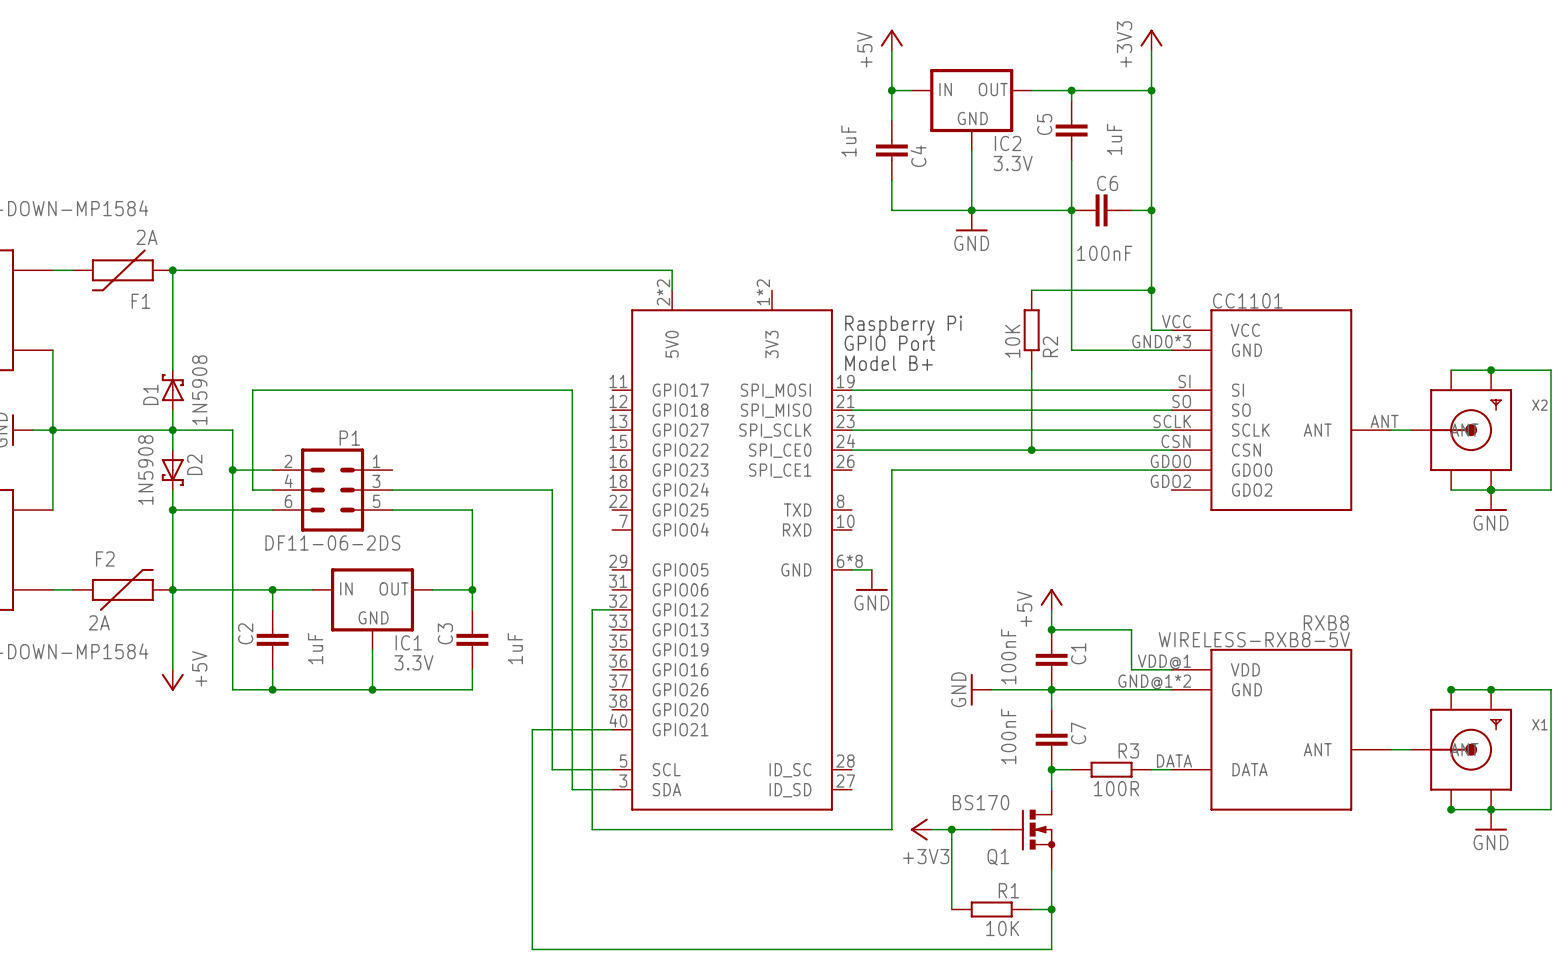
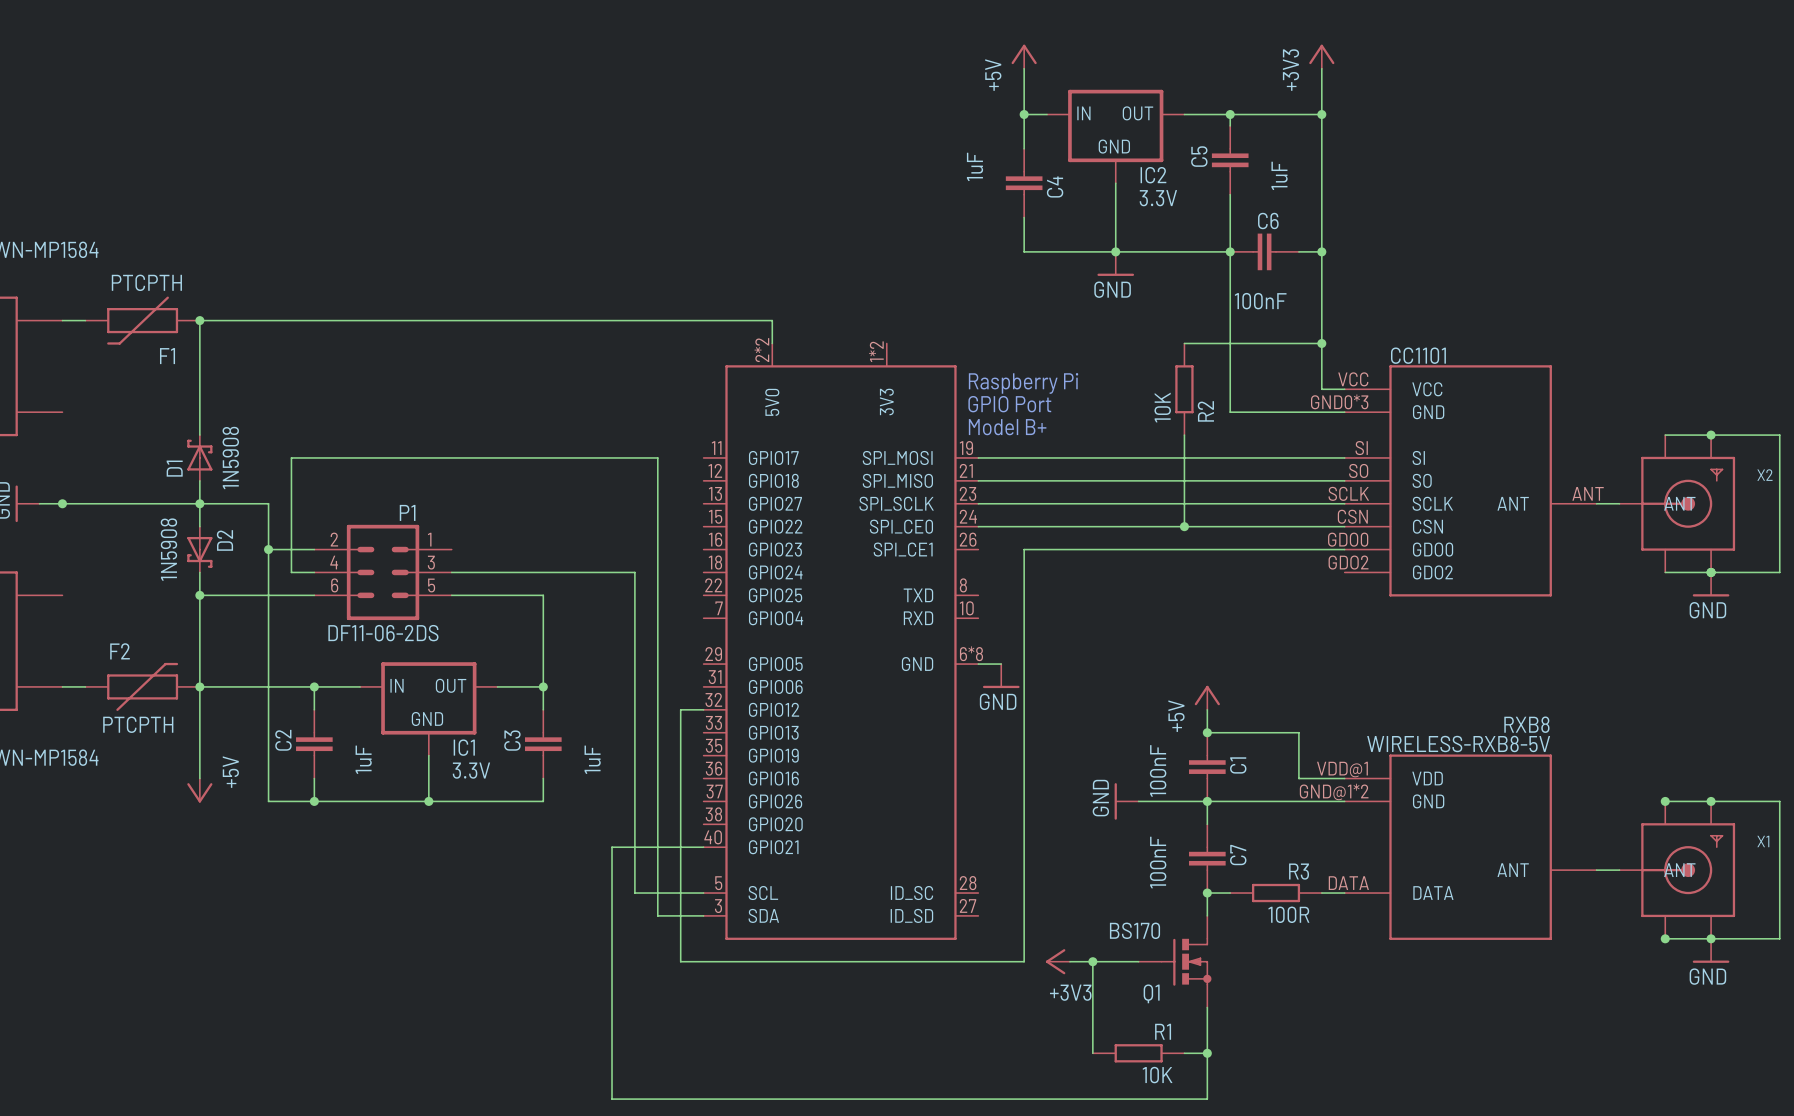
F1 value: 2A (146, 237) -> PTCPTH (146, 282)
wire: (52, 350) (52, 510) -> none
F2 value: 2A (99, 622) -> PTCPTH (138, 724)

